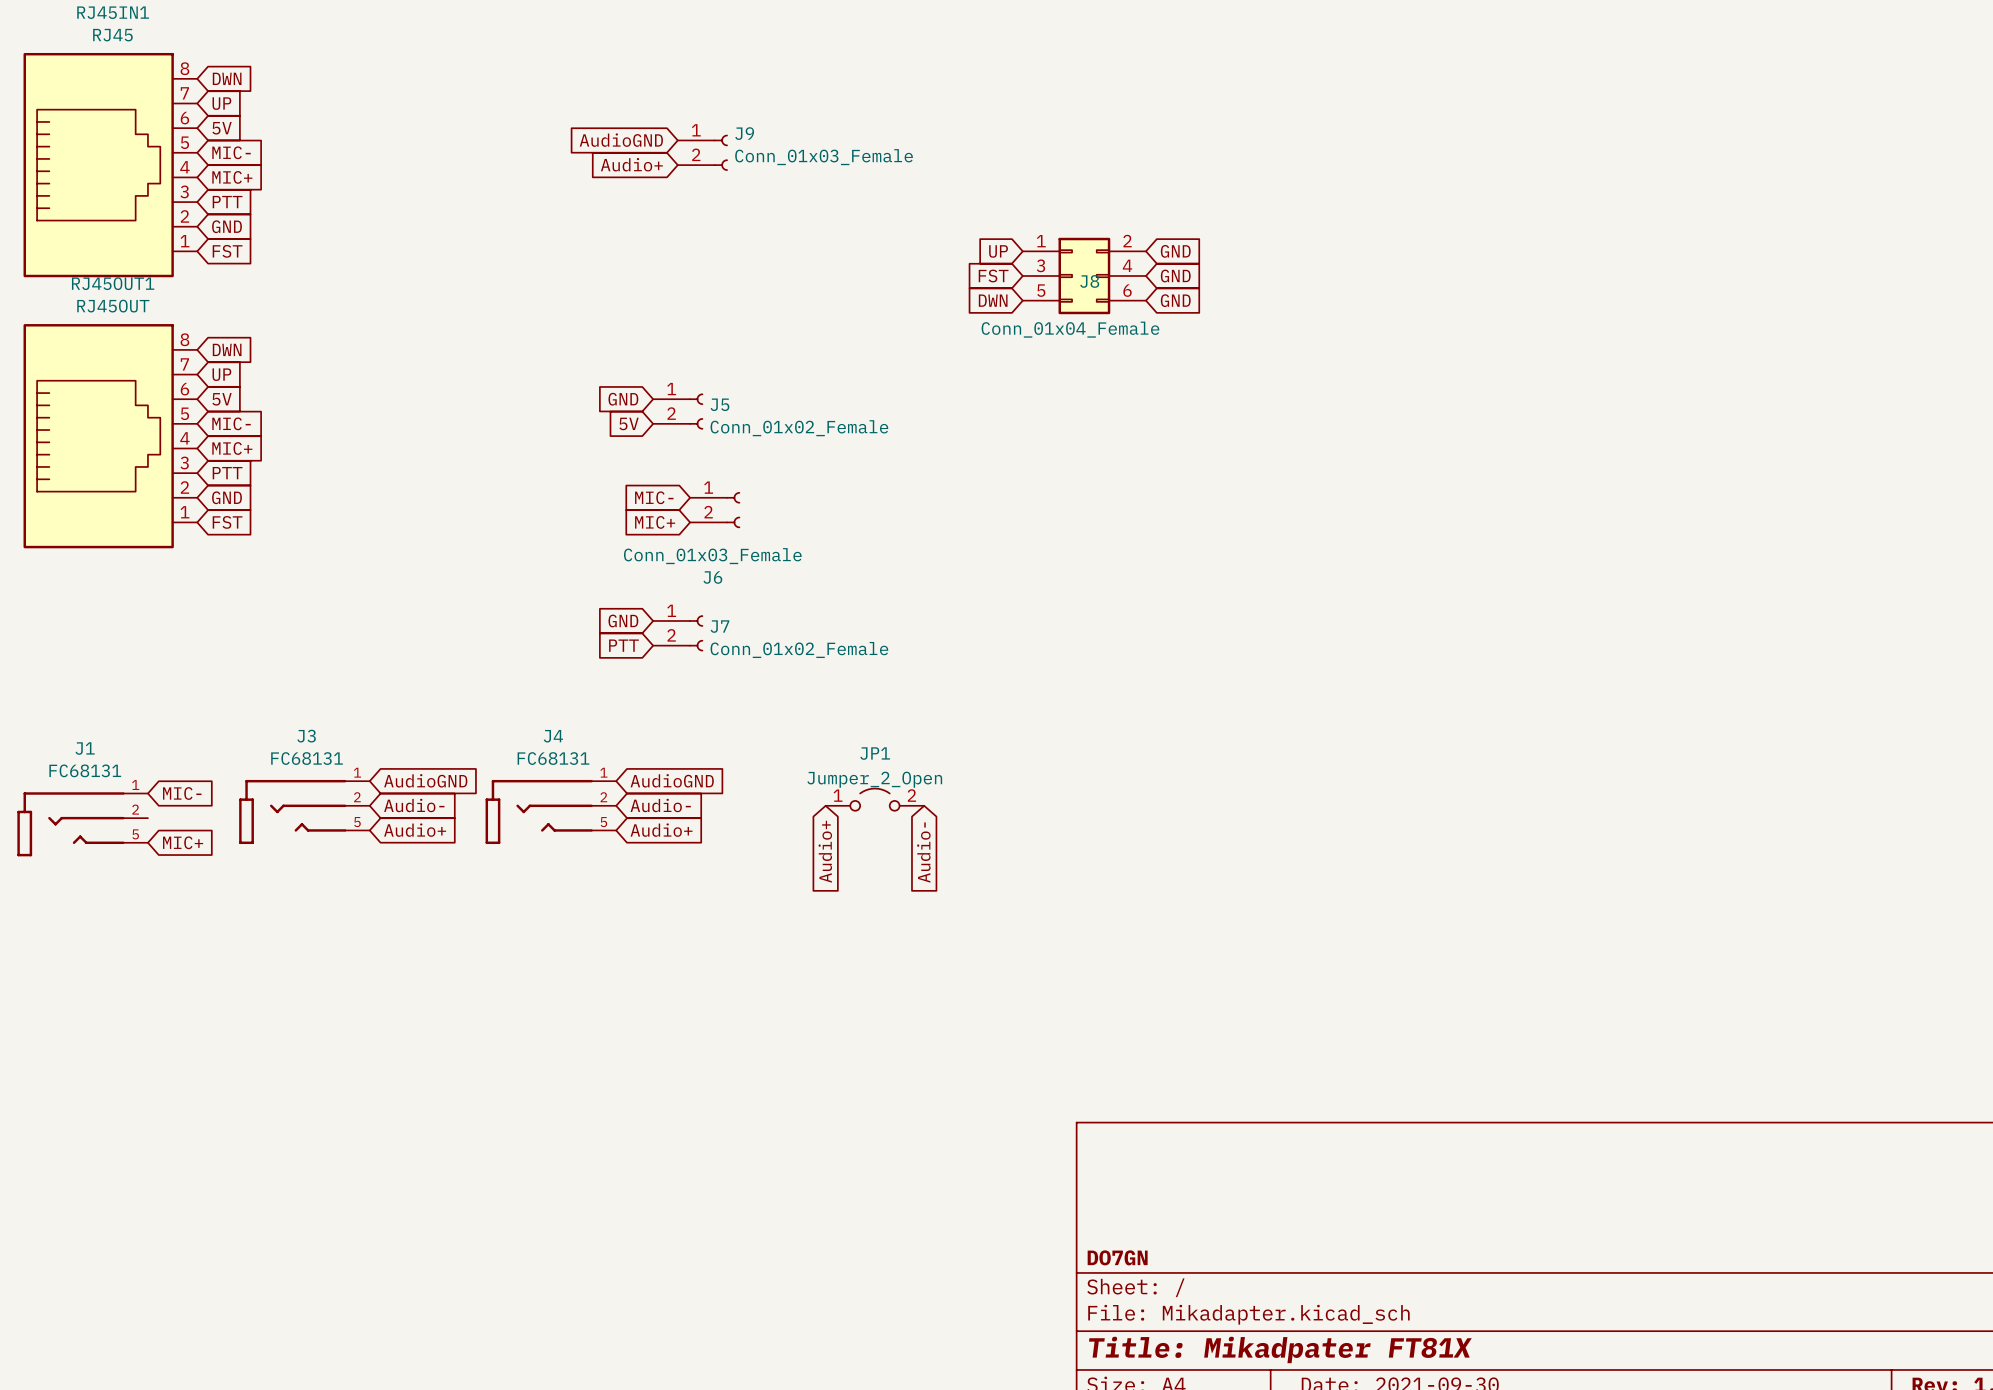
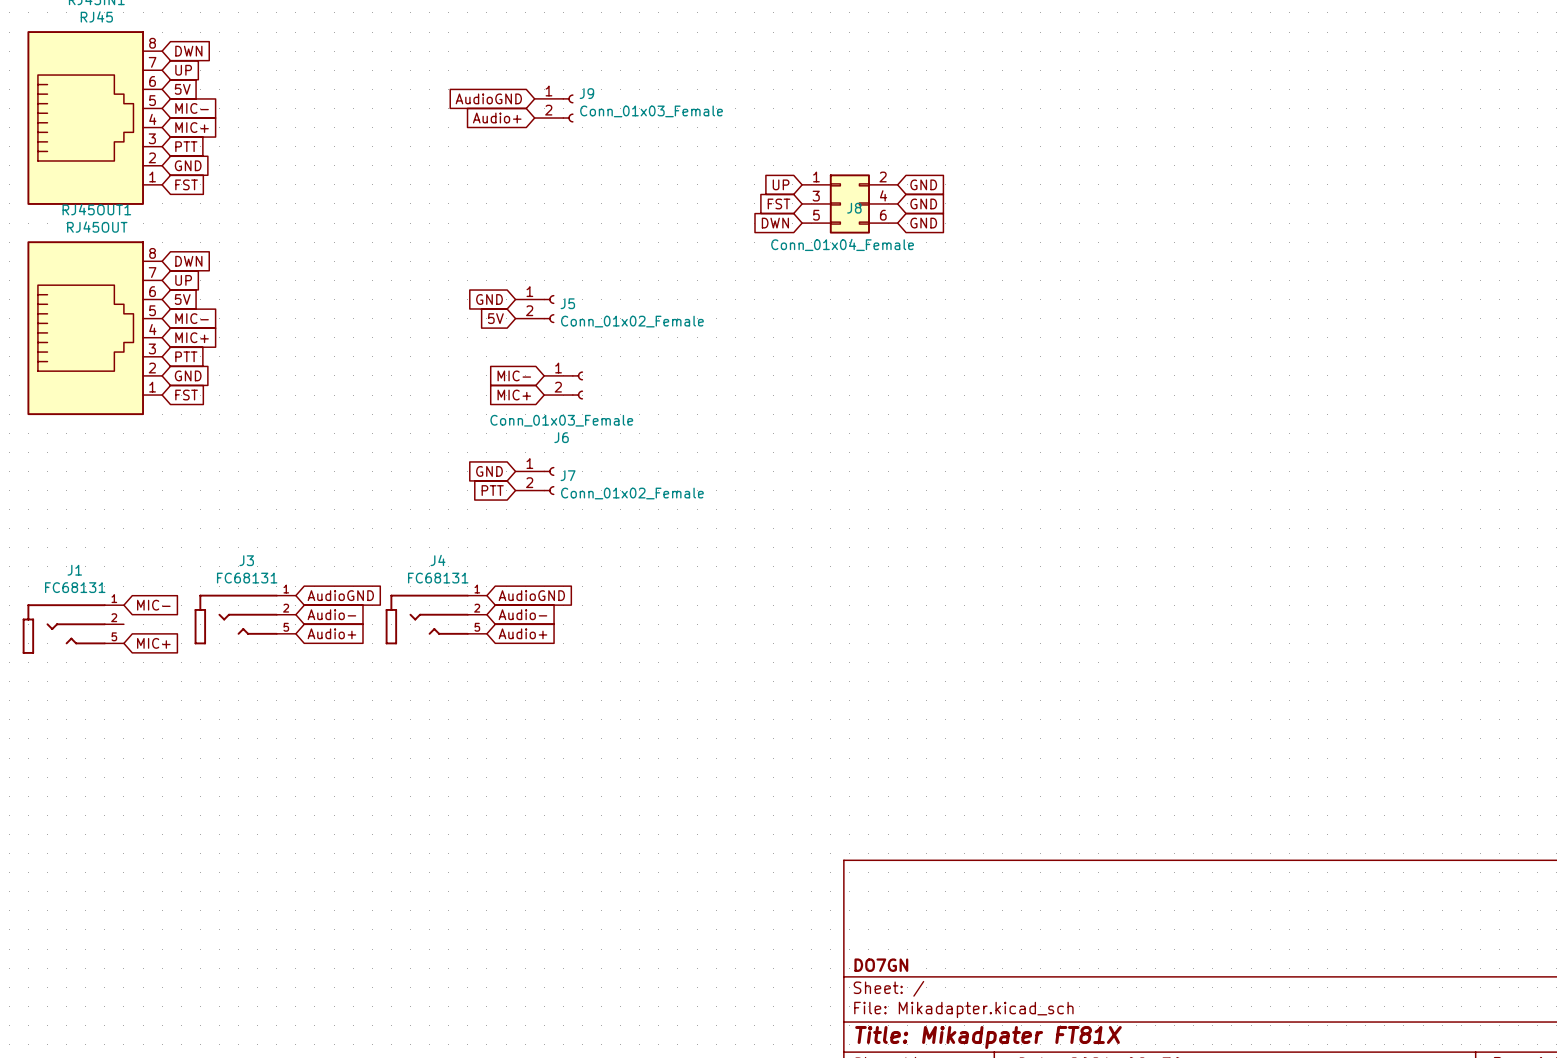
JP1: Jumper_2_Open (874, 799) -> none
global label: Audio+ (825, 851) -> none
global label: Audio- (923, 852) -> none

